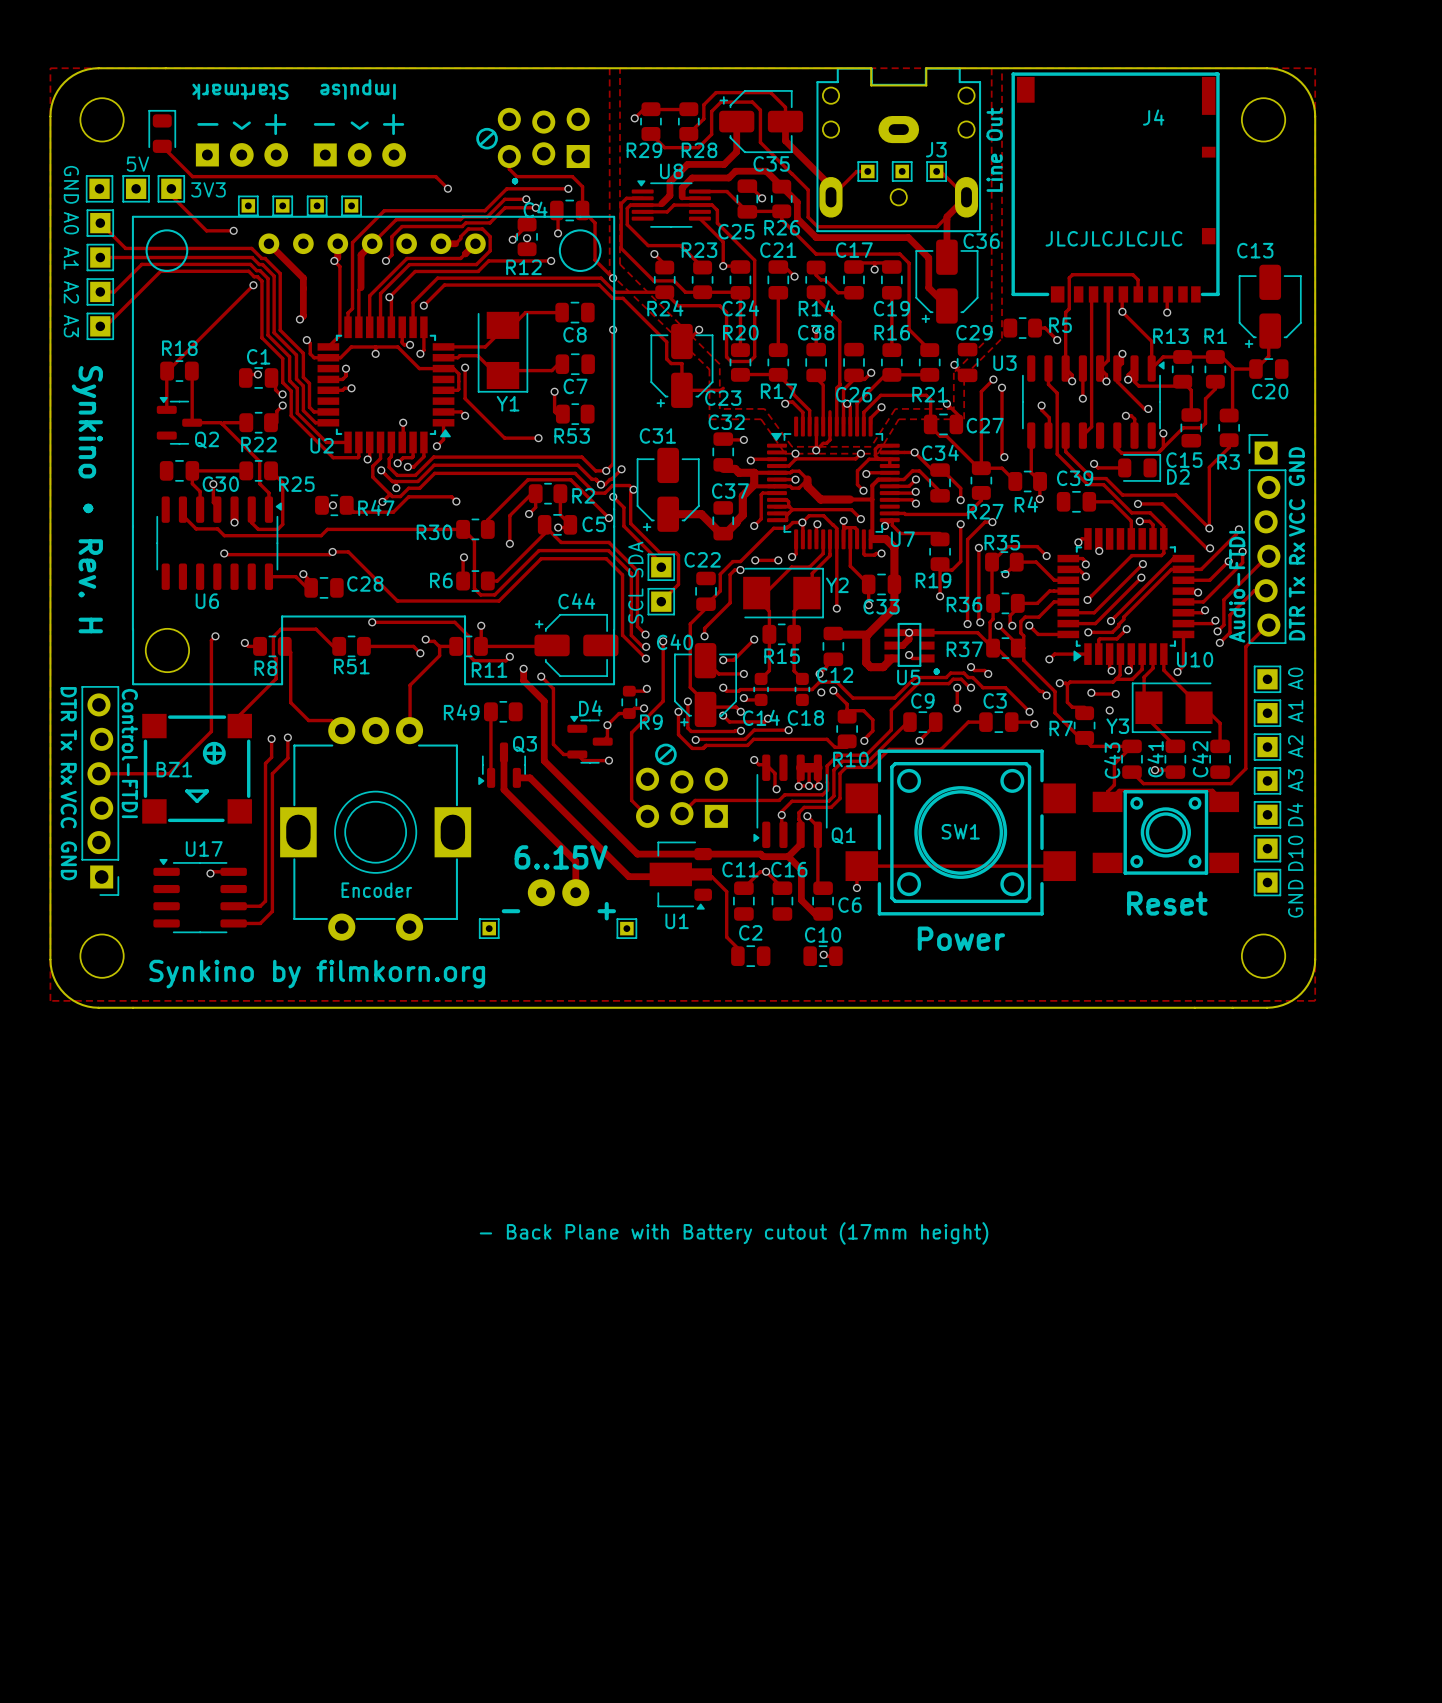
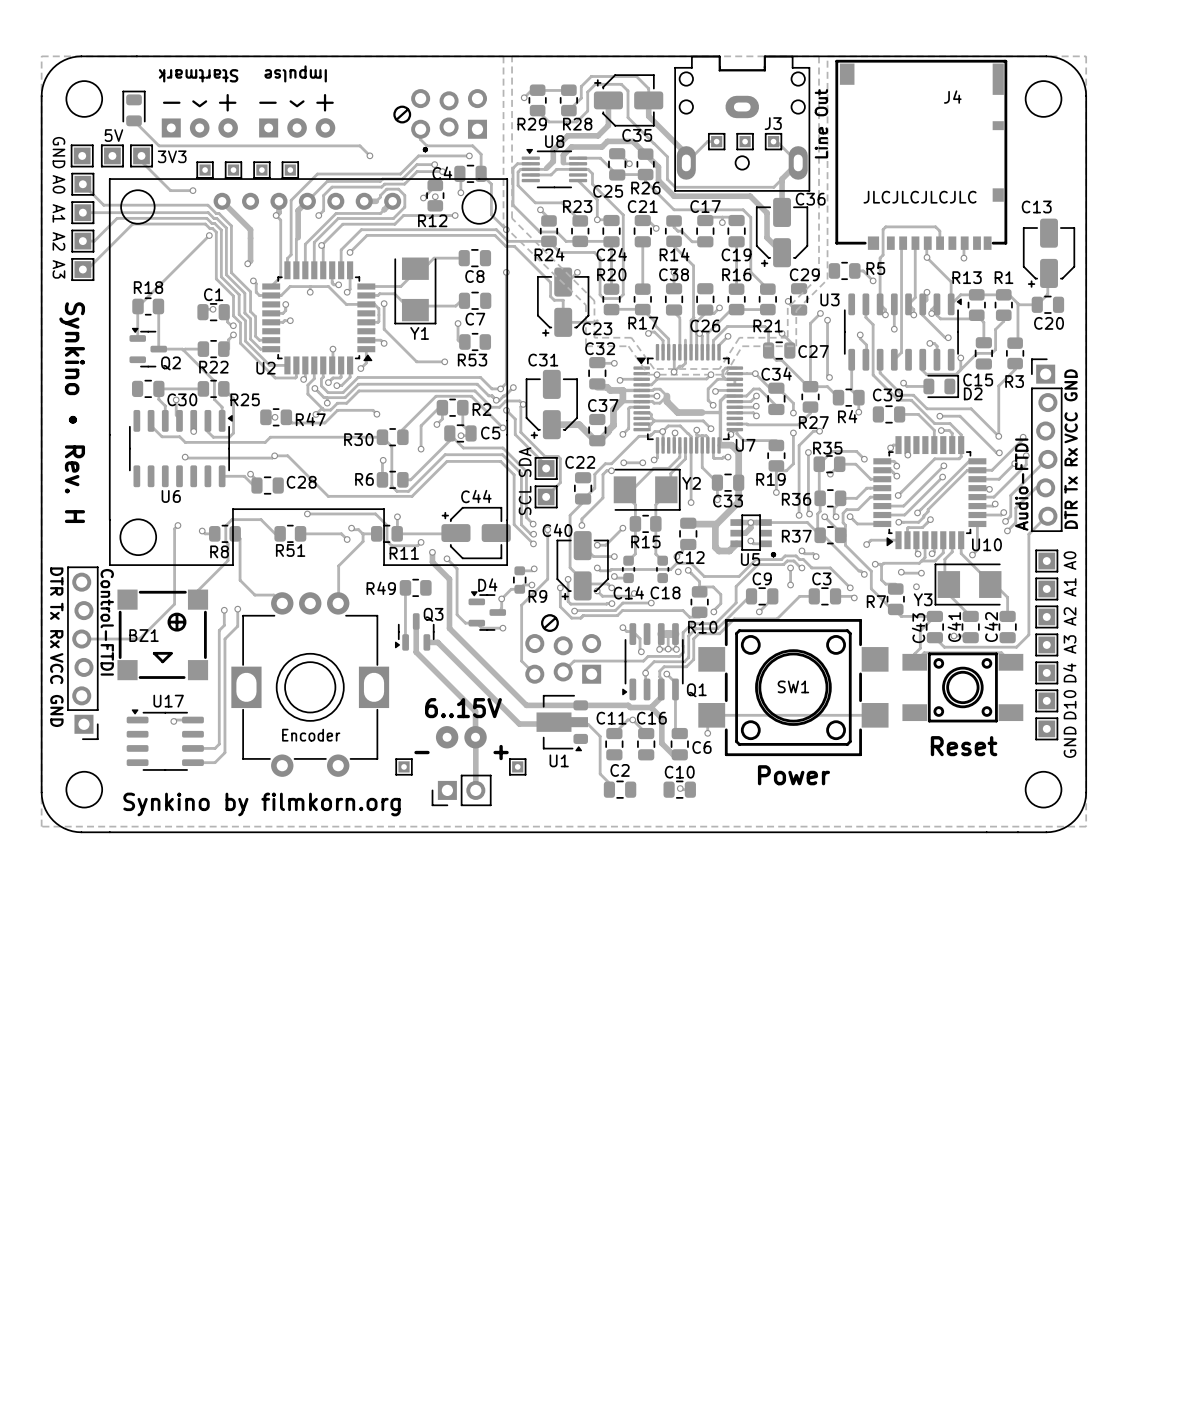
track: none -> (475, 737) (475, 790)
part: none -> (461, 790)
text: - Back Plane with Battery cutout (17mm height) (734, 1233) -> none

